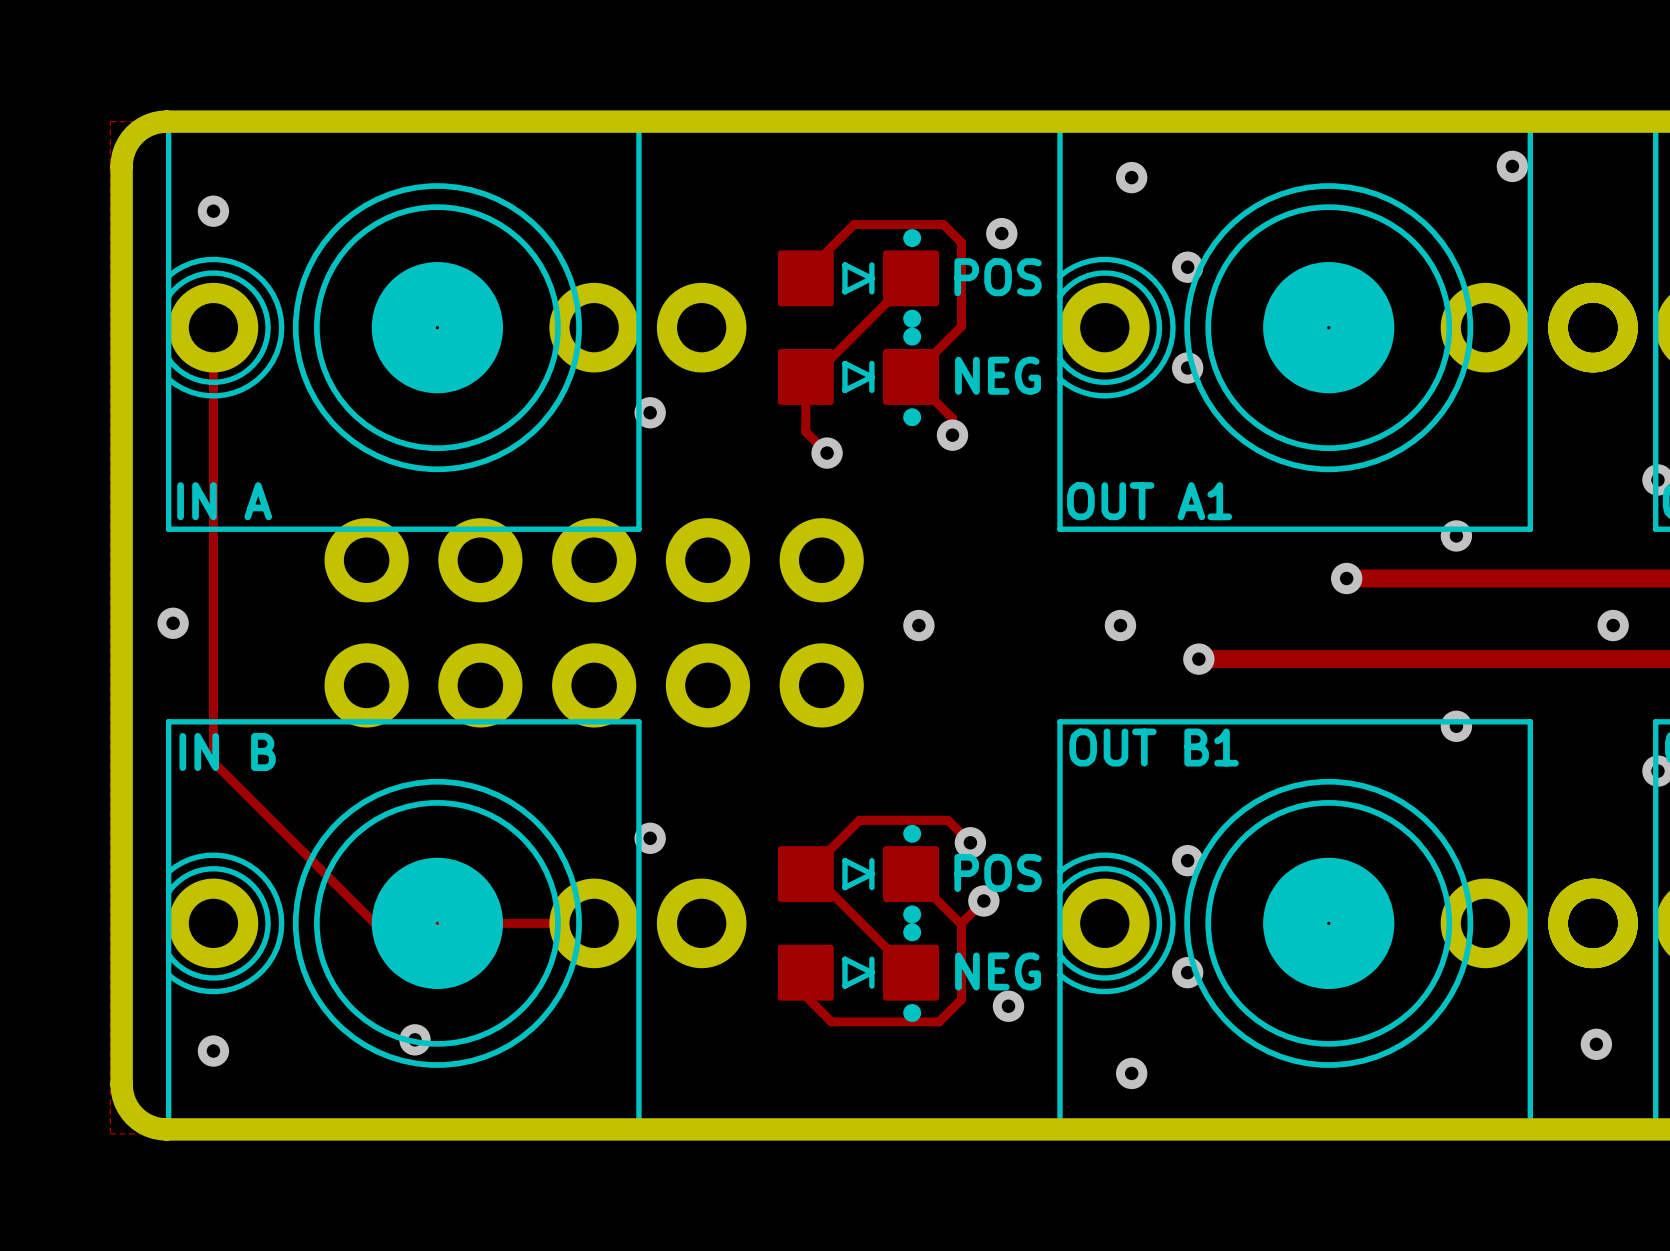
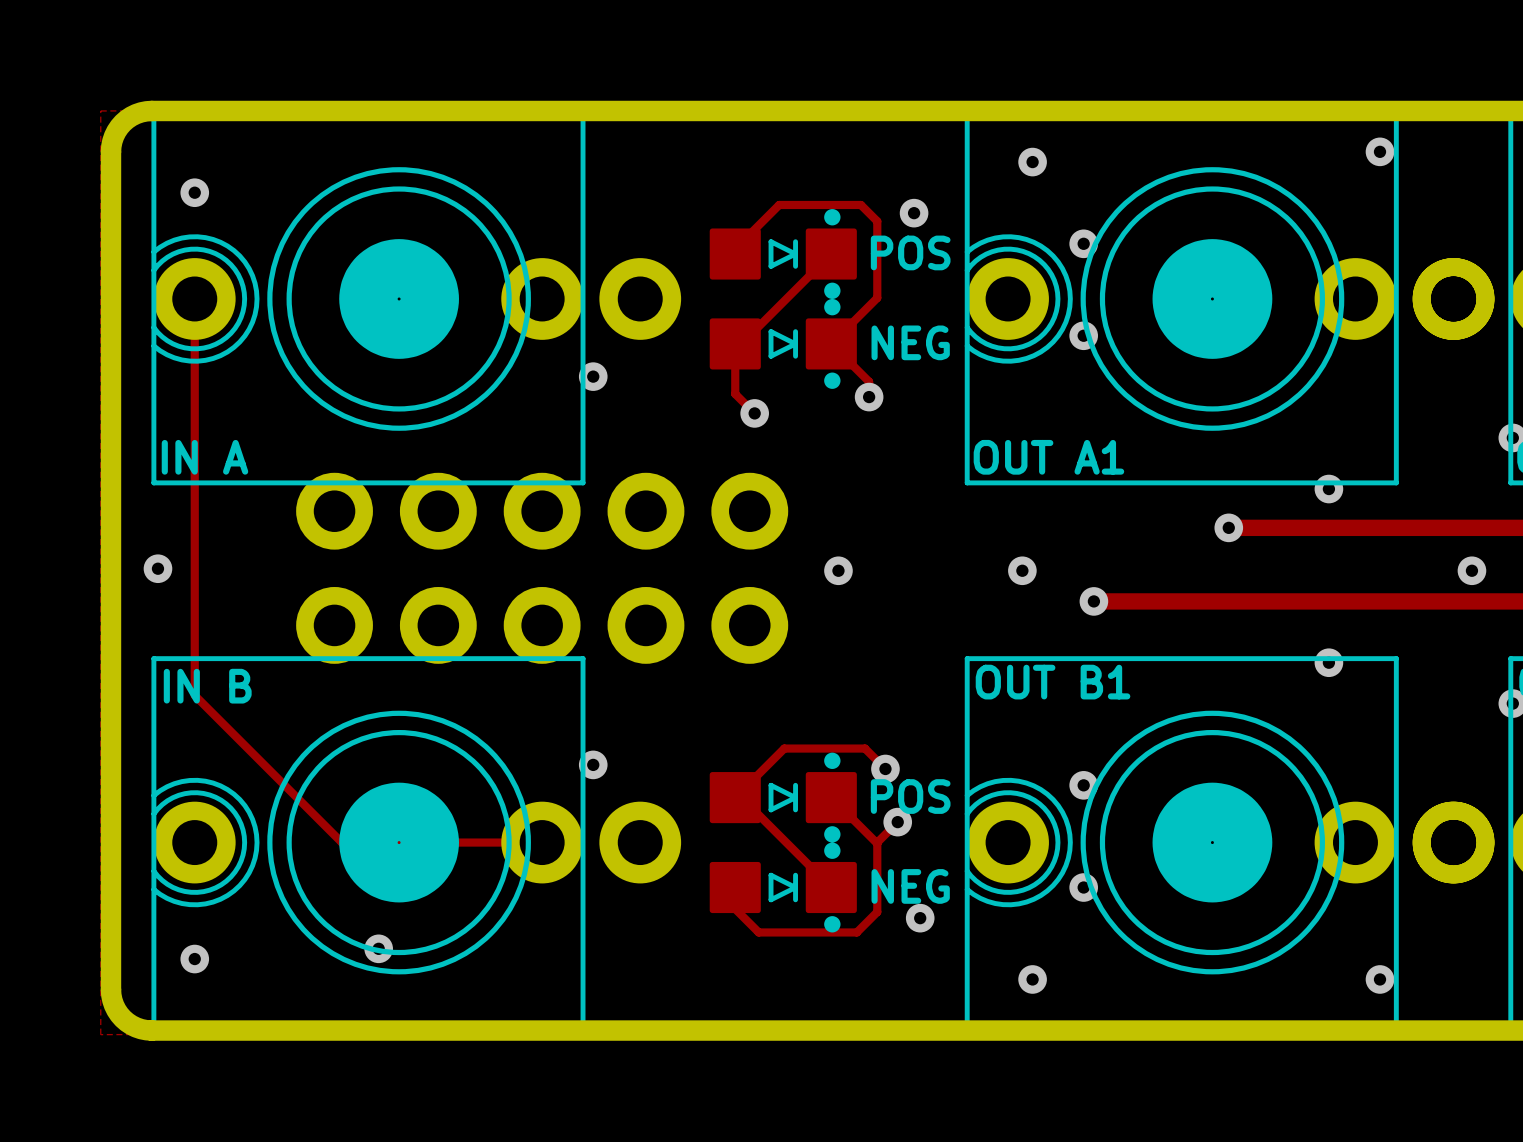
via position: (1596, 1044) -> (1380, 979)

